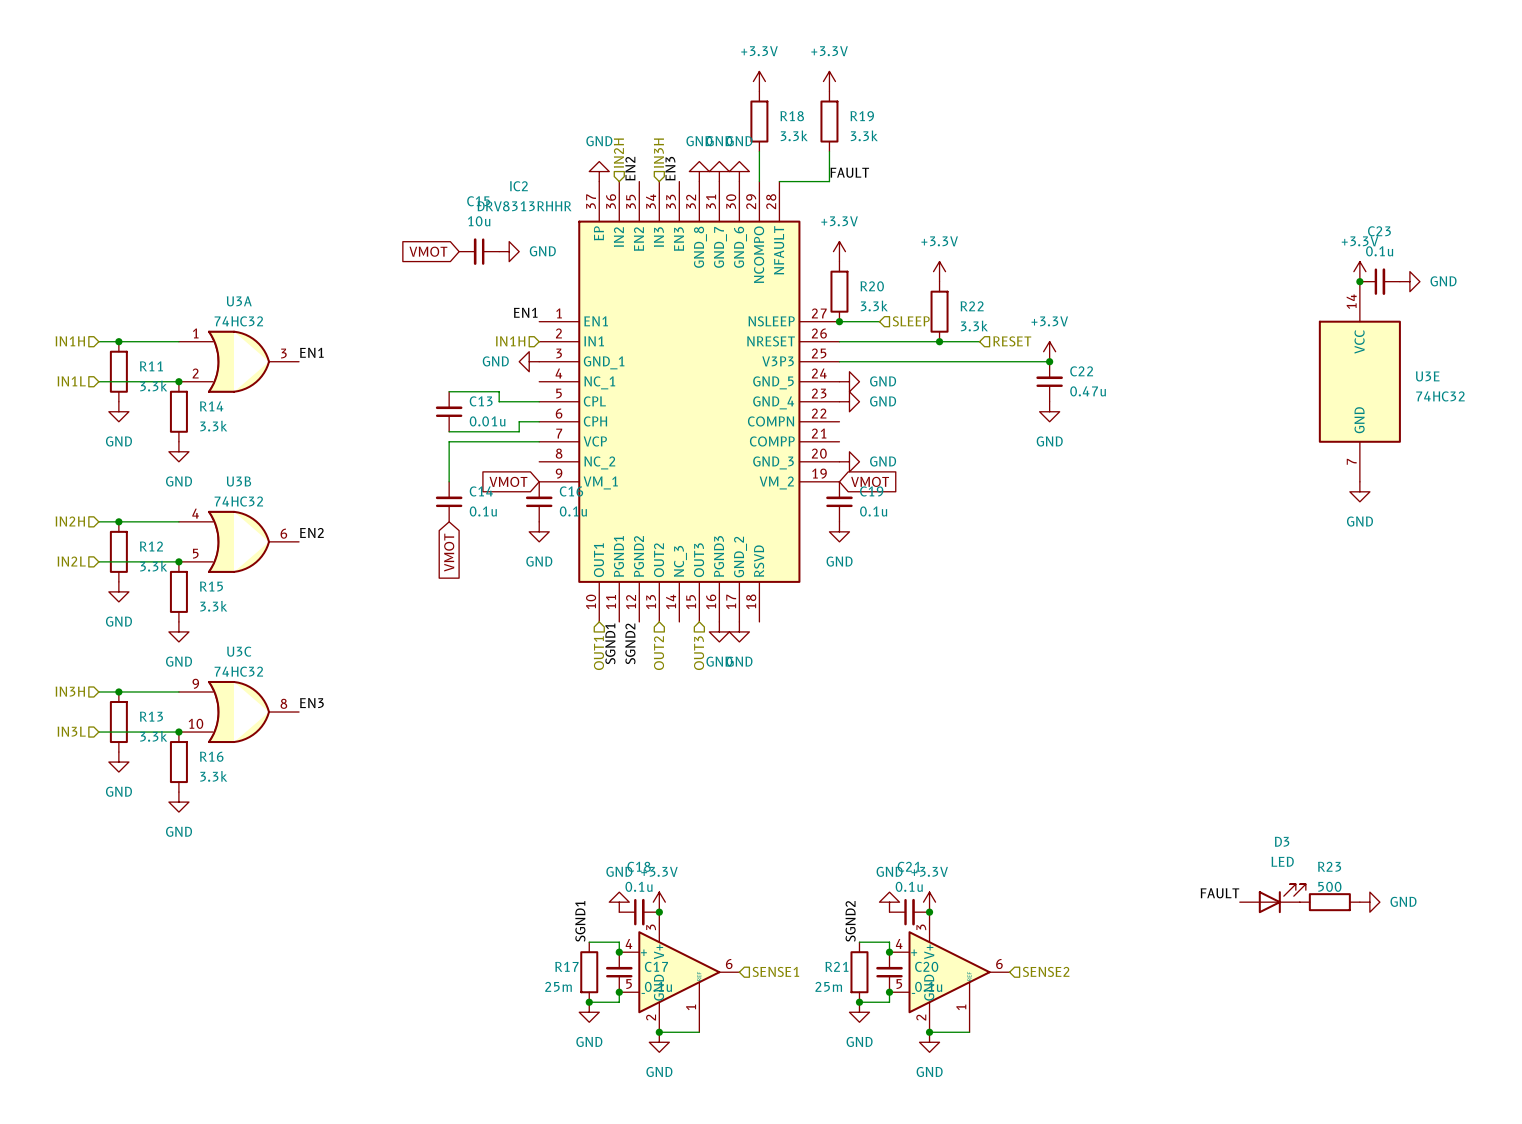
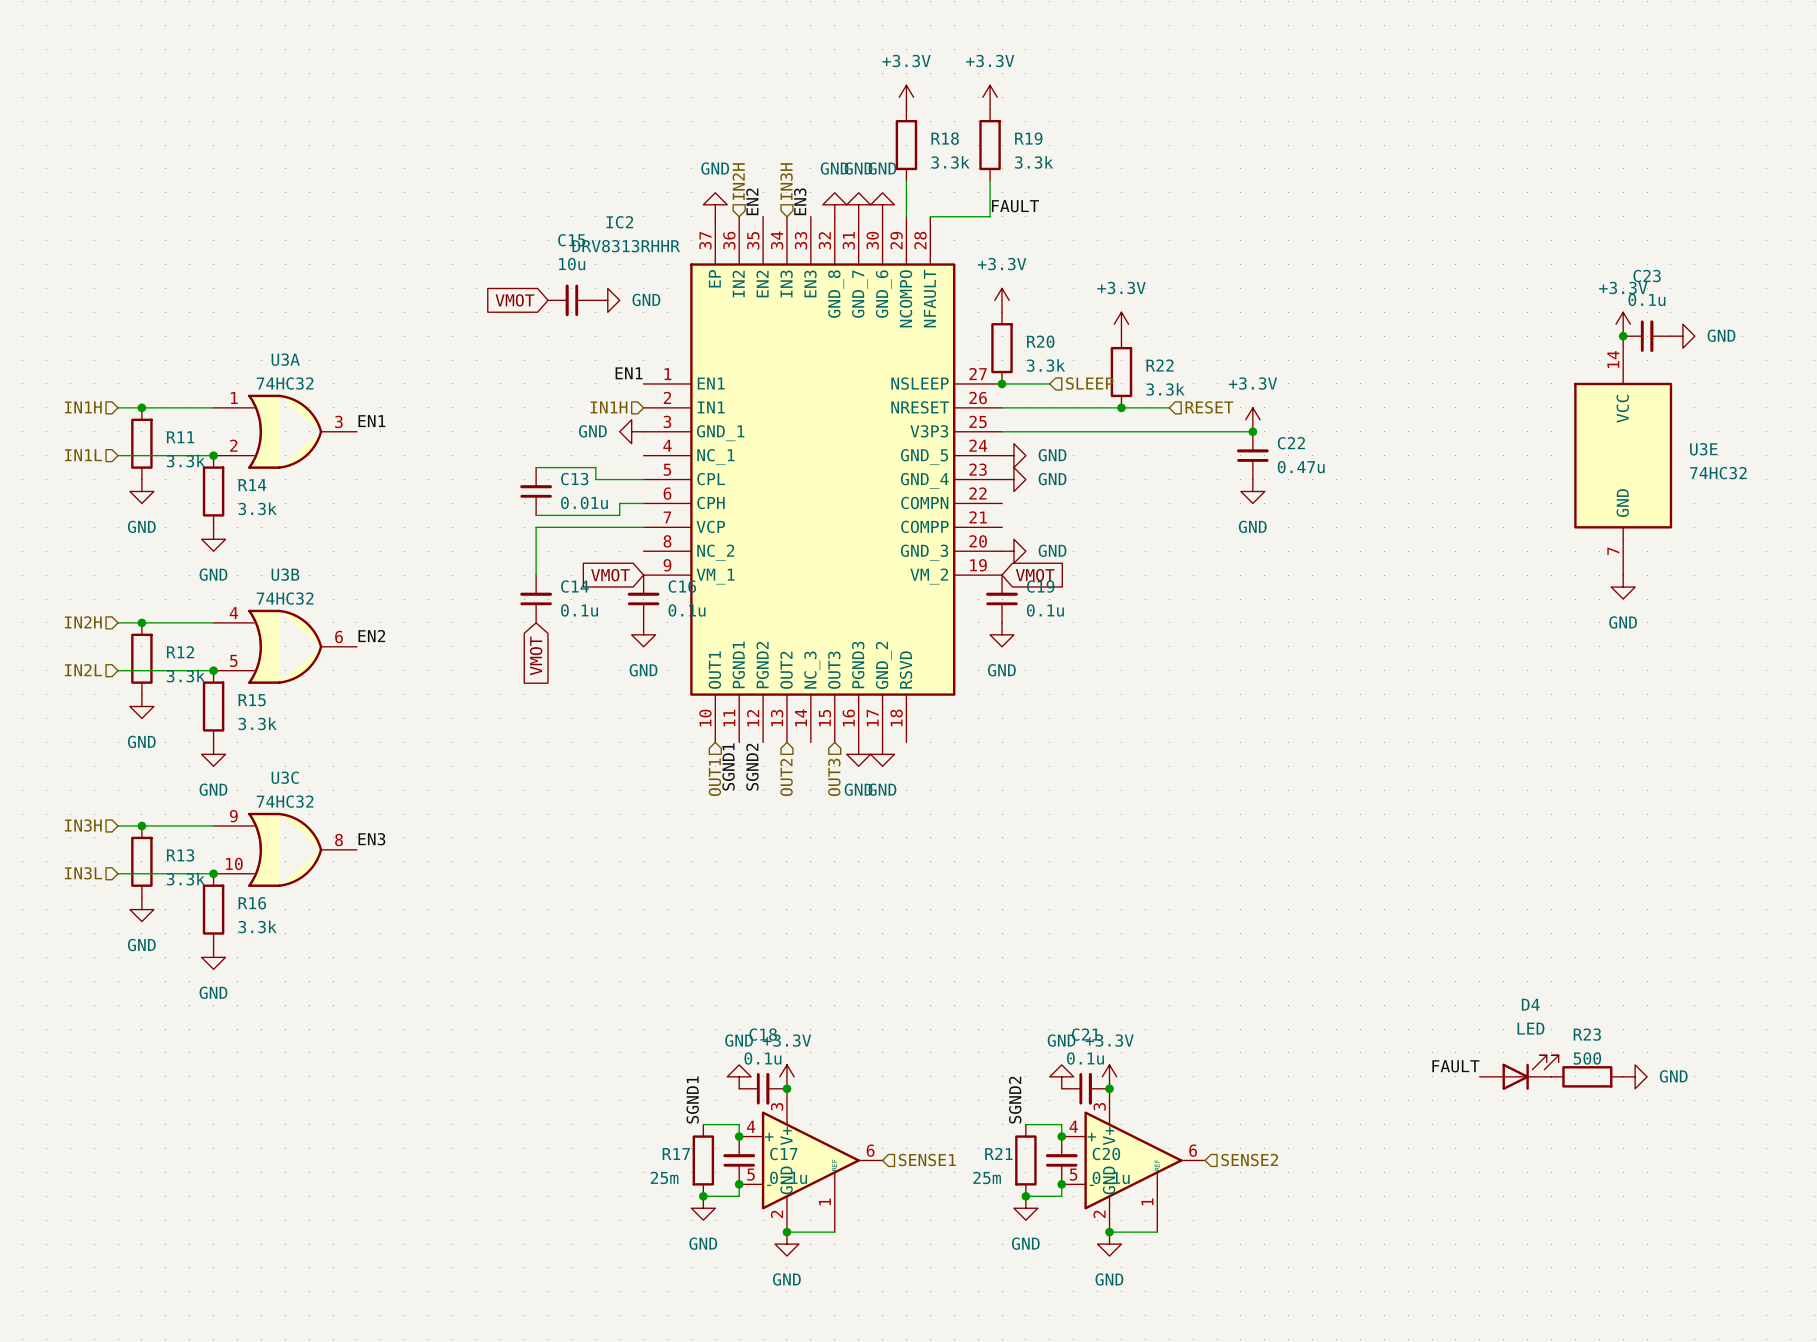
D3 name: D3 (1282, 841) -> D4 (1530, 1004)

